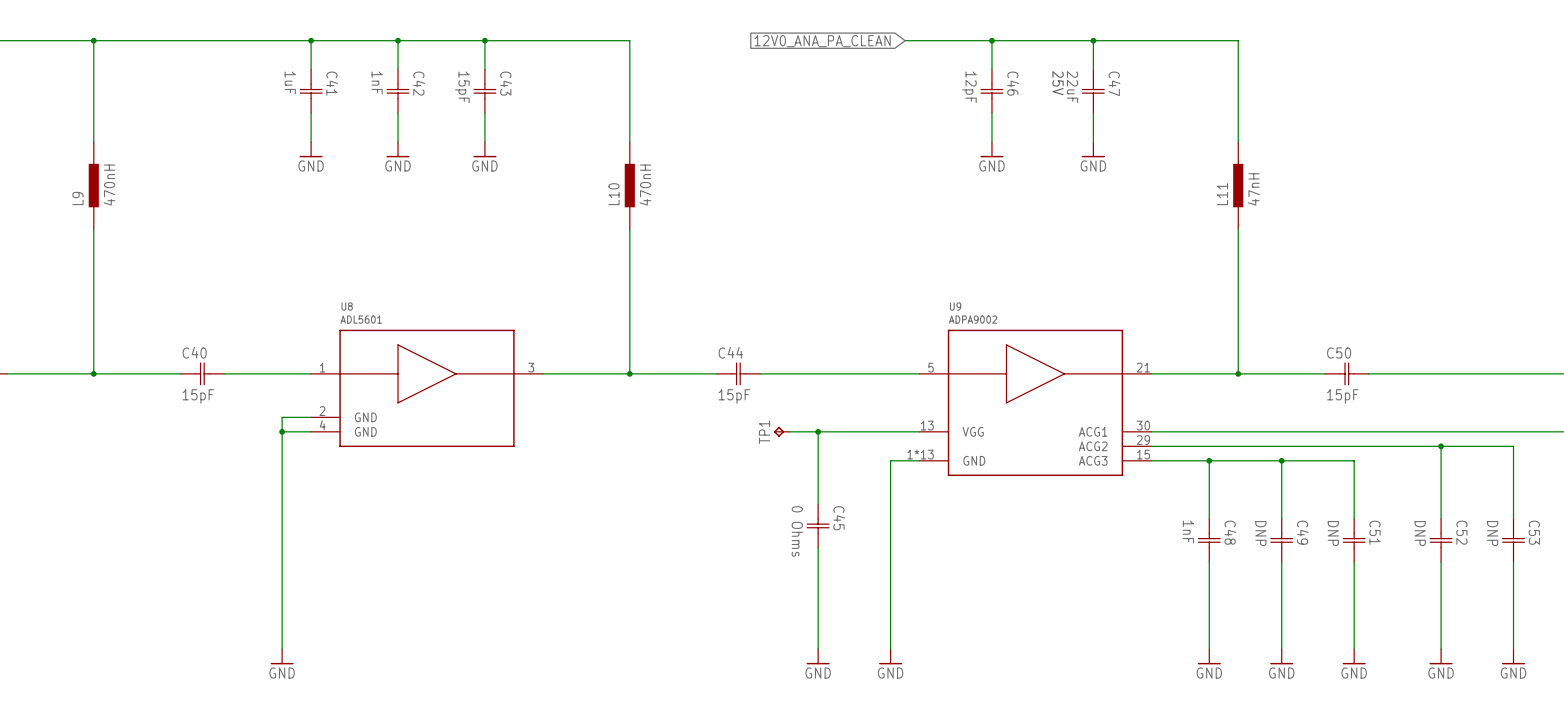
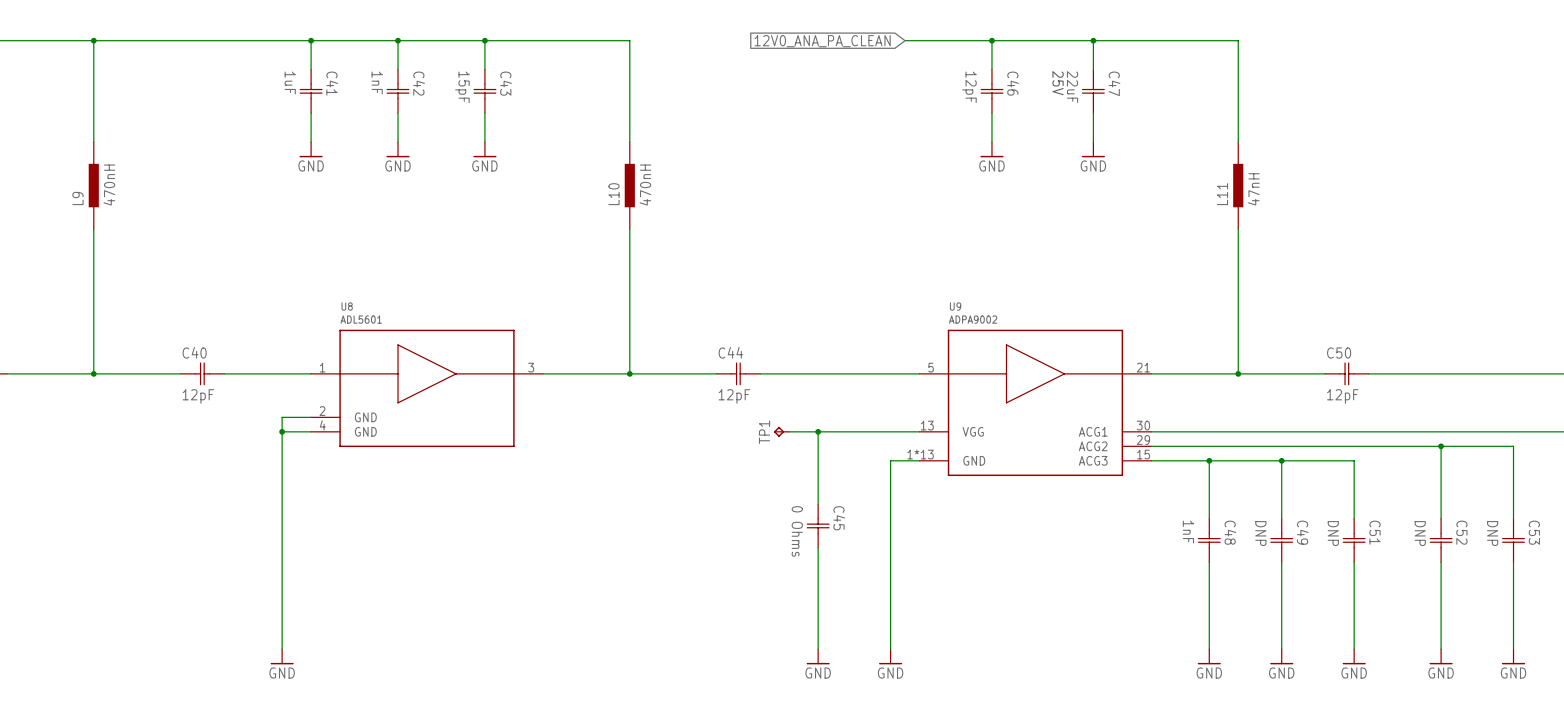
C40 value: 15pF (198, 396) -> 12pF (198, 396)
C44 value: 15pF (734, 396) -> 12pF (734, 396)
C50 value: 15pF (1342, 396) -> 12pF (1342, 396)

